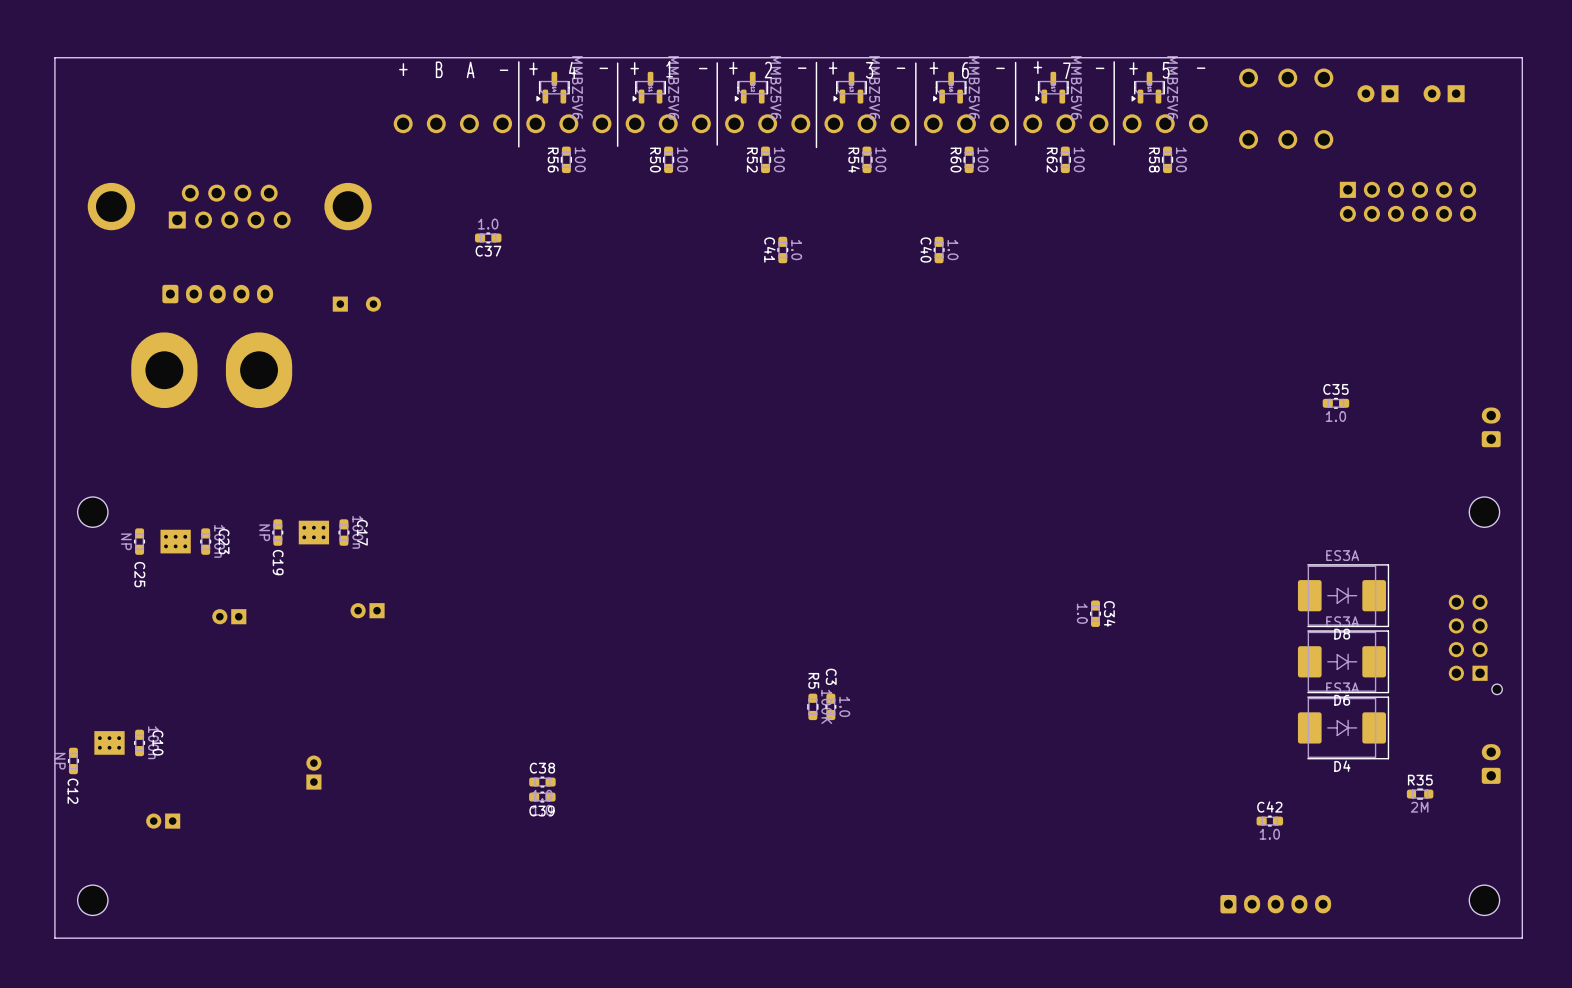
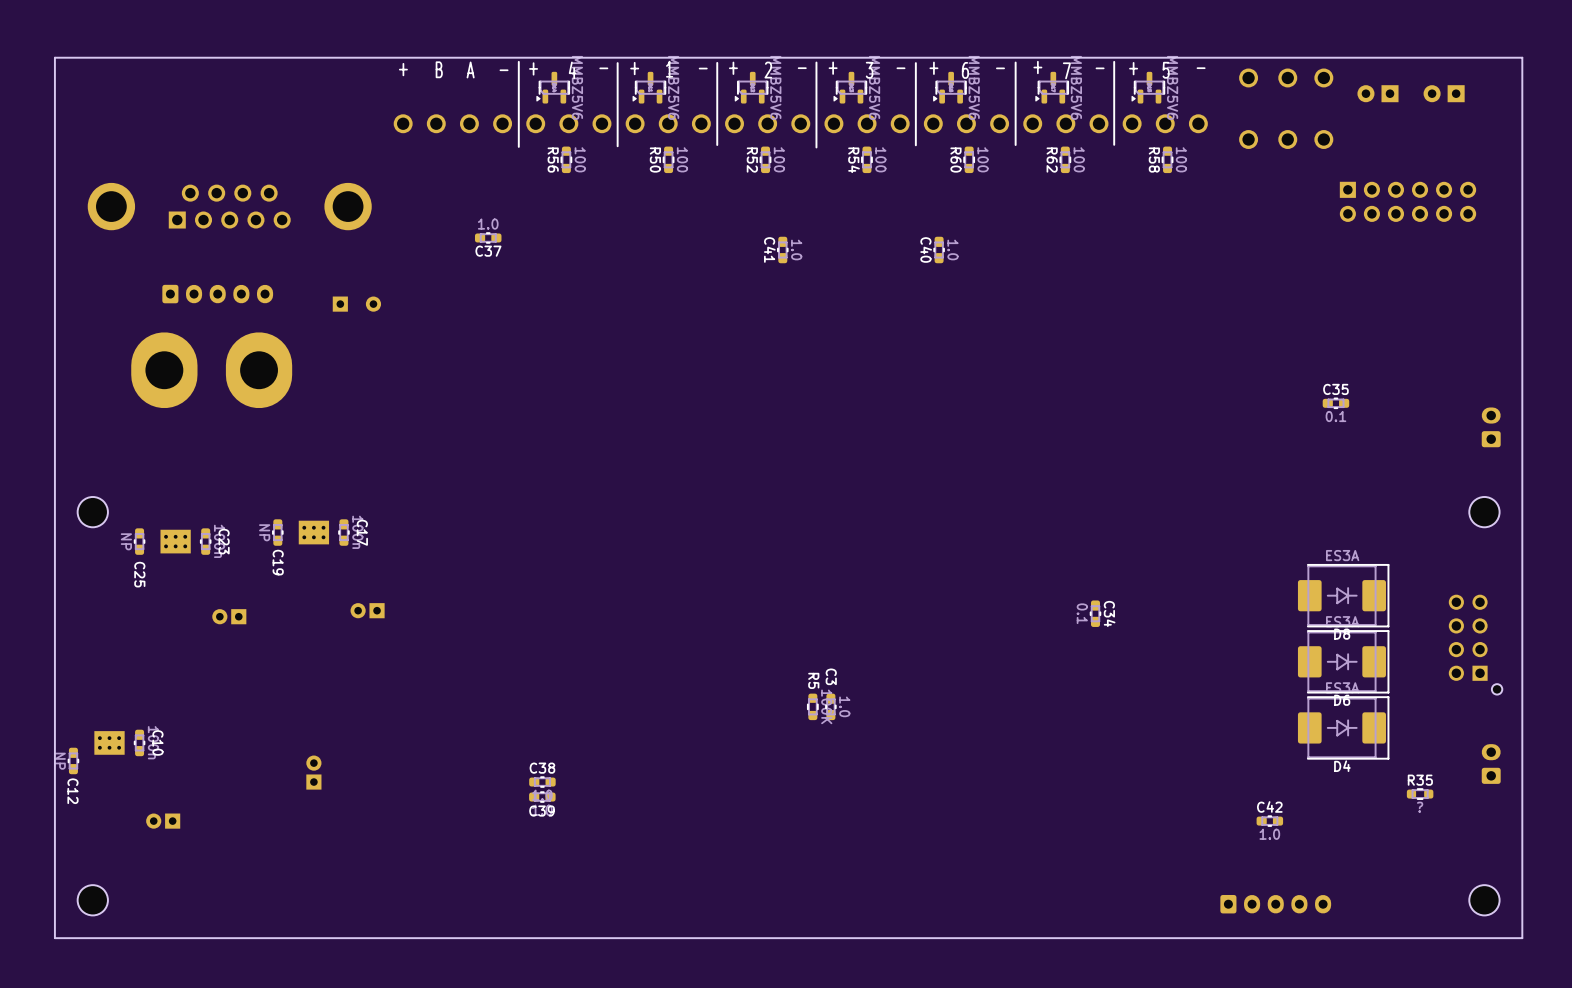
C35 value: 1.0 (1335, 416) -> 0.1 (1335, 416)
C34 value: 1.0 (1082, 613) -> 0.1 (1082, 613)
R35 value: 2M (1419, 807) -> ? (1420, 807)

